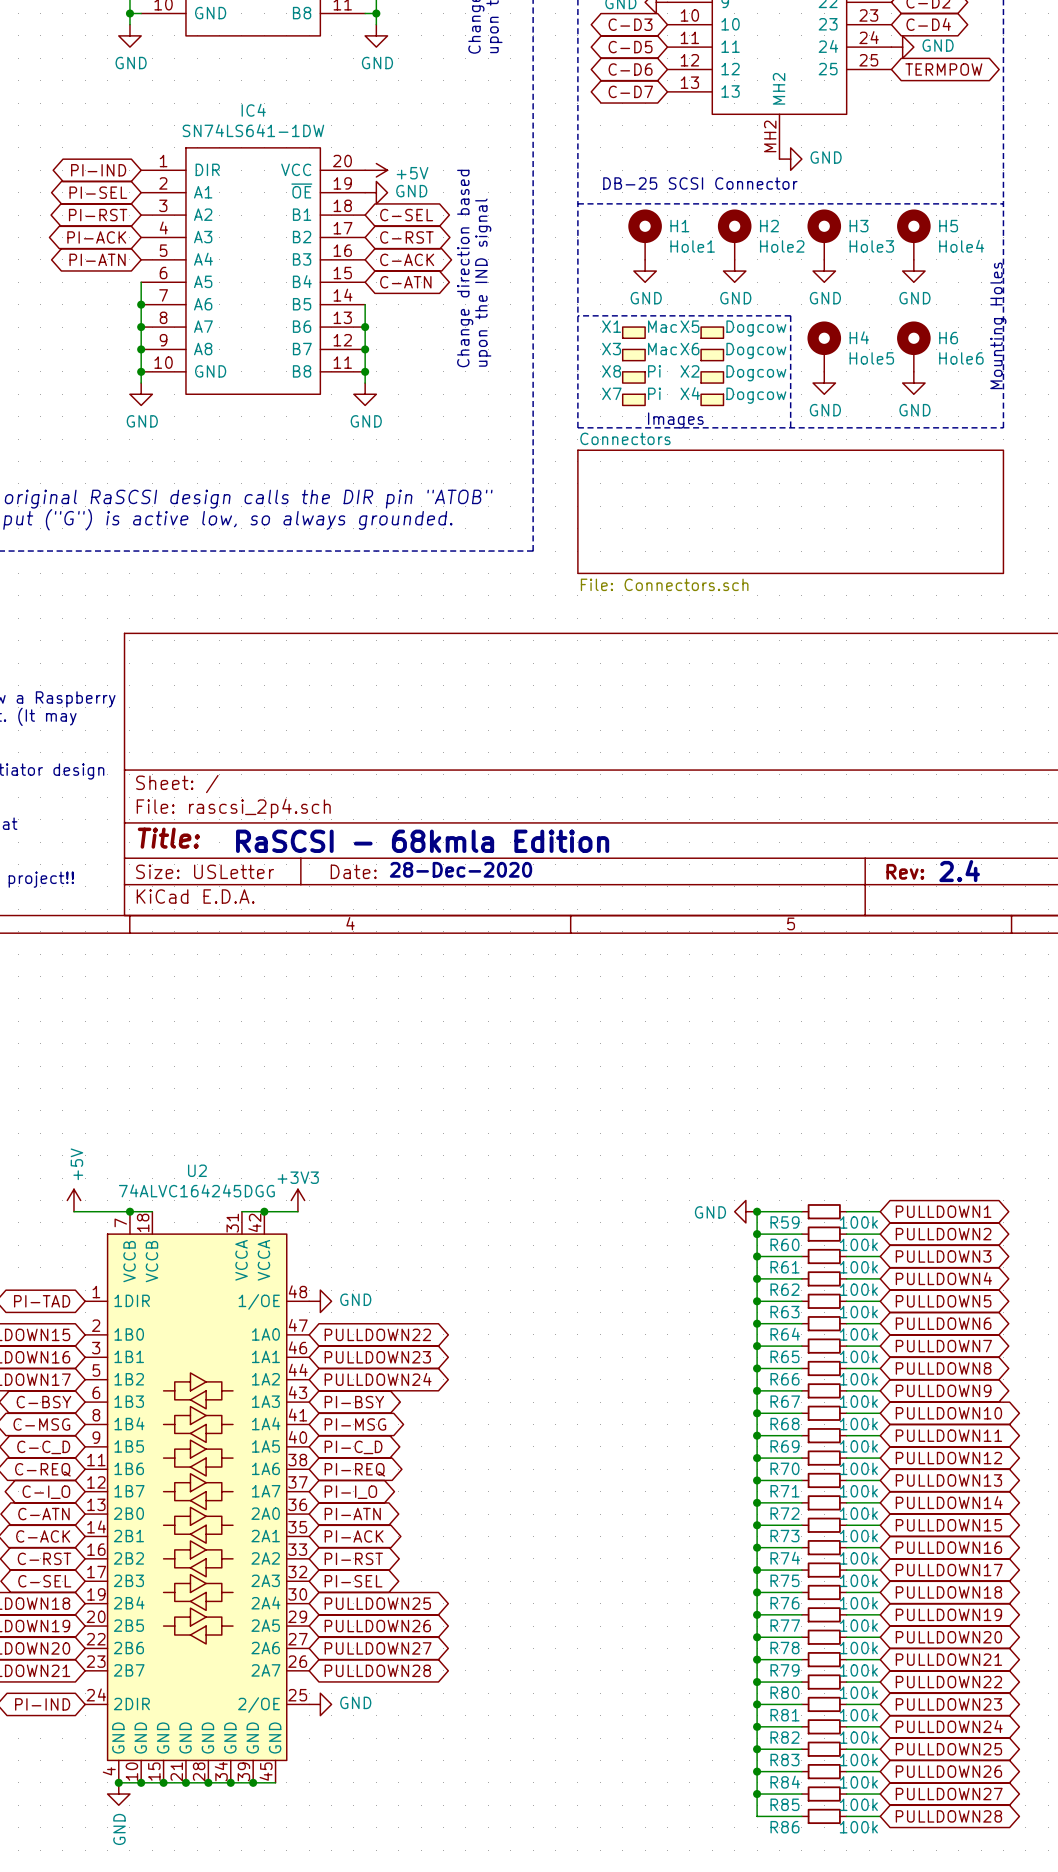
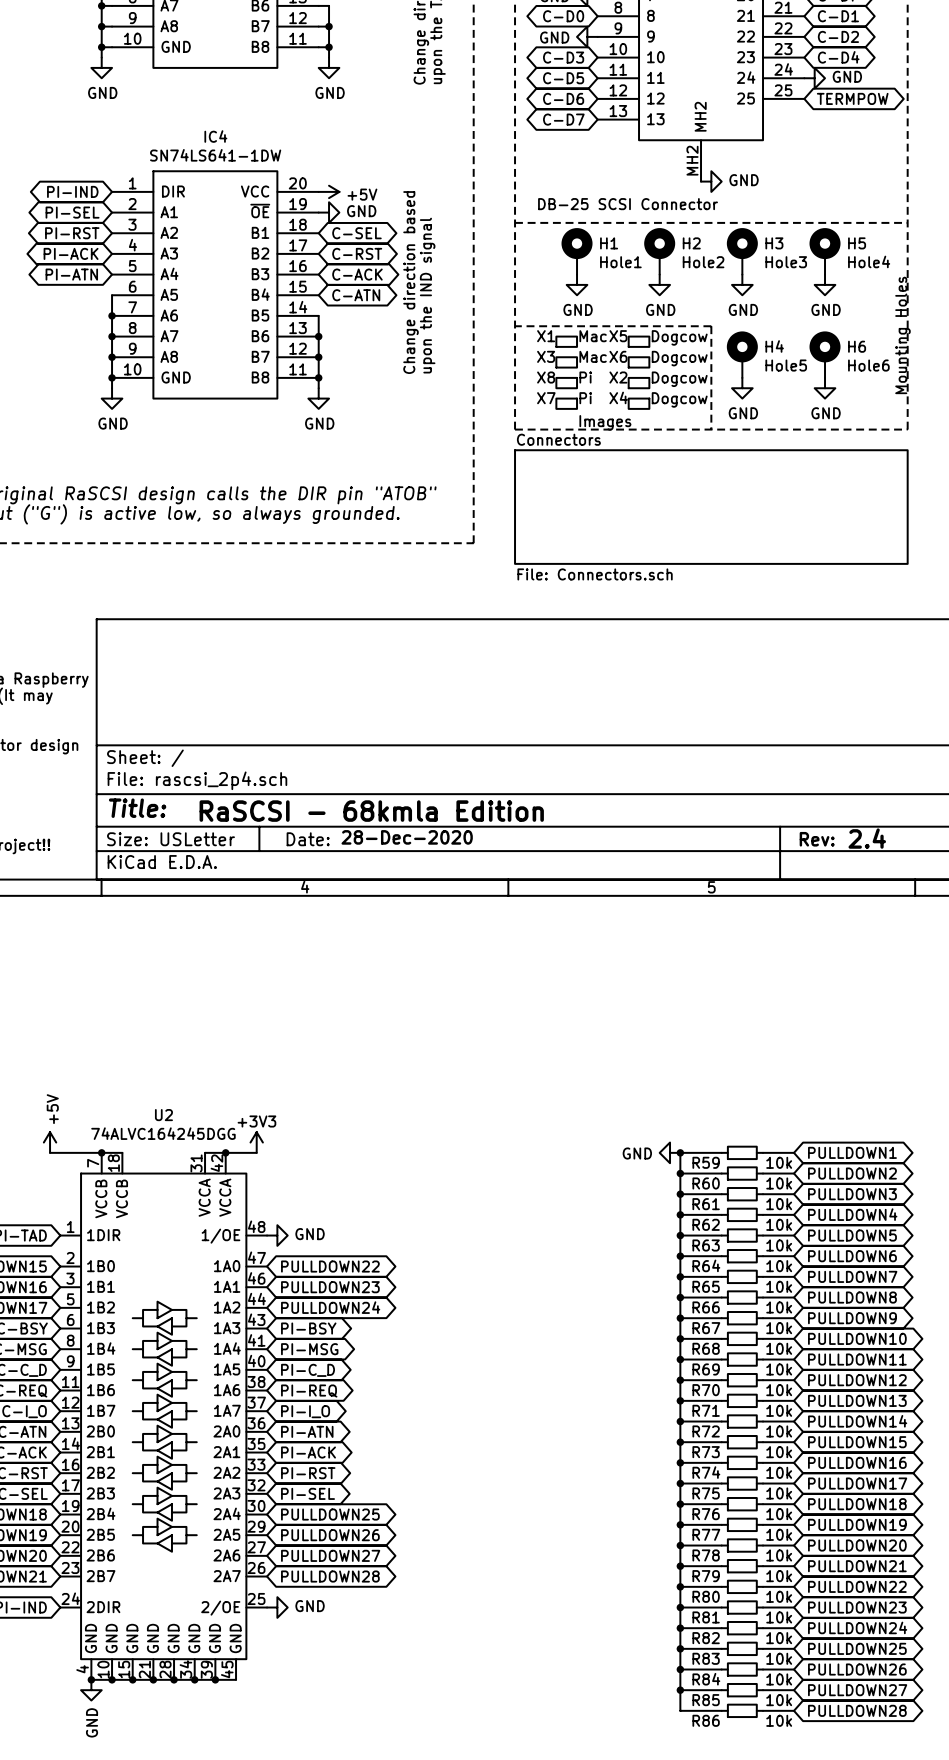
R59 value: 100k (858, 1222) -> 10k (779, 1162)
R60 value: 100k (858, 1244) -> 10k (779, 1183)
R61 value: 100k (858, 1267) -> 10k (779, 1204)
R62 value: 100k (858, 1289) -> 10k (779, 1224)
R63 value: 100k (858, 1312) -> 10k (779, 1245)
R64 value: 100k (858, 1334) -> 10k (779, 1266)
R65 value: 100k (858, 1356) -> 10k (779, 1286)
R66 value: 100k (858, 1379) -> 10k (779, 1307)
R67 value: 100k (858, 1401) -> 10k (779, 1328)
R68 value: 100k (858, 1424) -> 10k (779, 1348)
R69 value: 100k (858, 1446) -> 10k (779, 1369)
R70 value: 100k (858, 1468) -> 10k (779, 1390)
R71 value: 100k (858, 1491) -> 10k (779, 1410)
R72 value: 100k (858, 1513) -> 10k (779, 1431)
R73 value: 100k (858, 1536) -> 10k (779, 1452)
R74 value: 100k (858, 1558) -> 10k (779, 1472)
R75 value: 100k (858, 1580) -> 10k (779, 1493)
R76 value: 100k (858, 1603) -> 10k (779, 1514)
R77 value: 100k (858, 1625) -> 10k (779, 1534)
R78 value: 100k (858, 1648) -> 10k (779, 1555)
R79 value: 100k (858, 1670) -> 10k (779, 1576)
R80 value: 100k (858, 1692) -> 10k (779, 1596)
R81 value: 100k (858, 1715) -> 10k (779, 1617)
R82 value: 100k (858, 1737) -> 10k (779, 1638)
R83 value: 100k (858, 1760) -> 10k (779, 1658)
R84 value: 100k (858, 1782) -> 10k (779, 1679)
R85 value: 100k (858, 1804) -> 10k (779, 1700)
R86 value: 100k (858, 1827) -> 10k (779, 1720)

